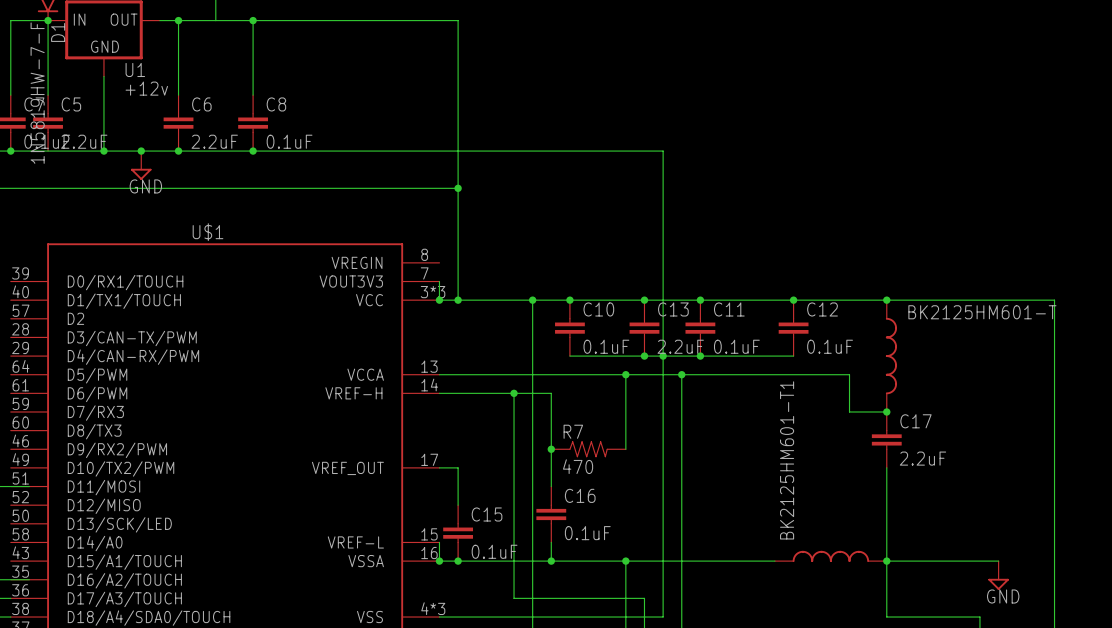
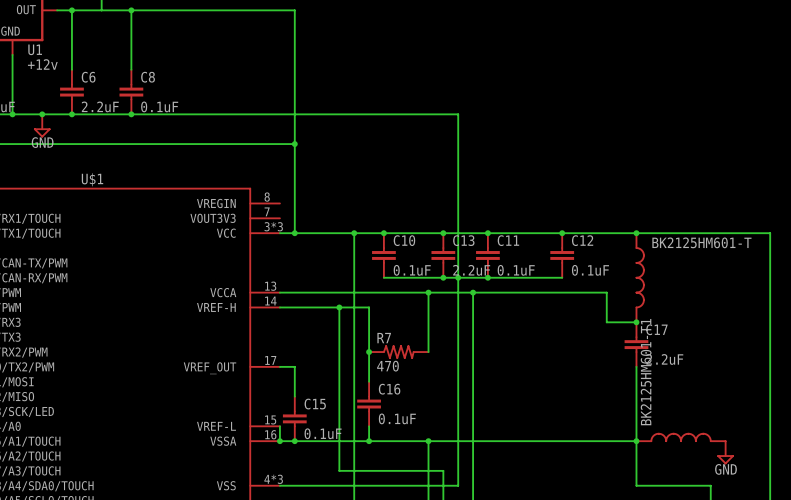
wire: (439, 281) (439, 300) -> none
junction: (439, 300) -> none
BK2125HM601-T1 position: (830, 556) -> (681, 437)
wire: (886, 561) (998, 561) -> (636, 441) (547, 441)

